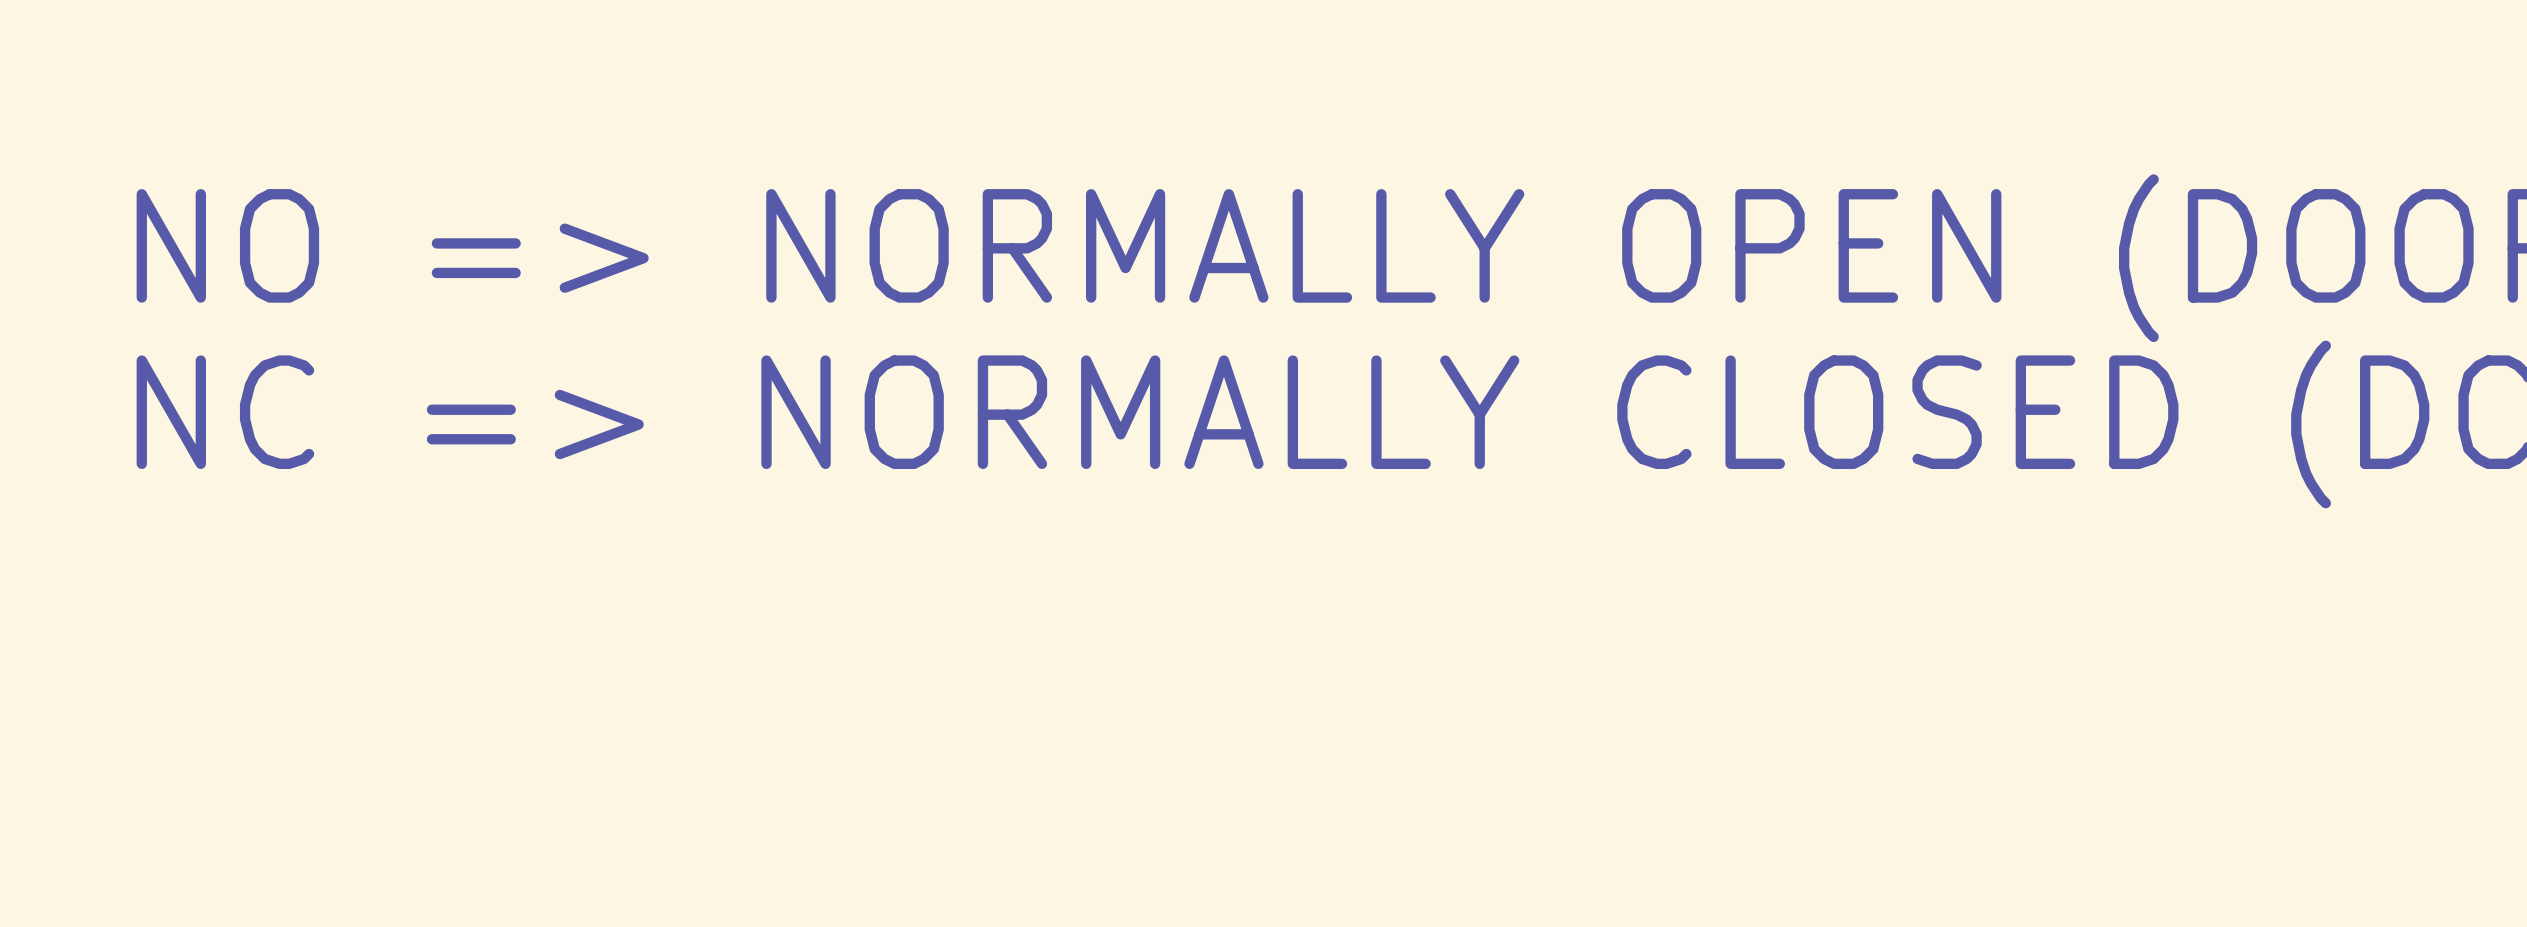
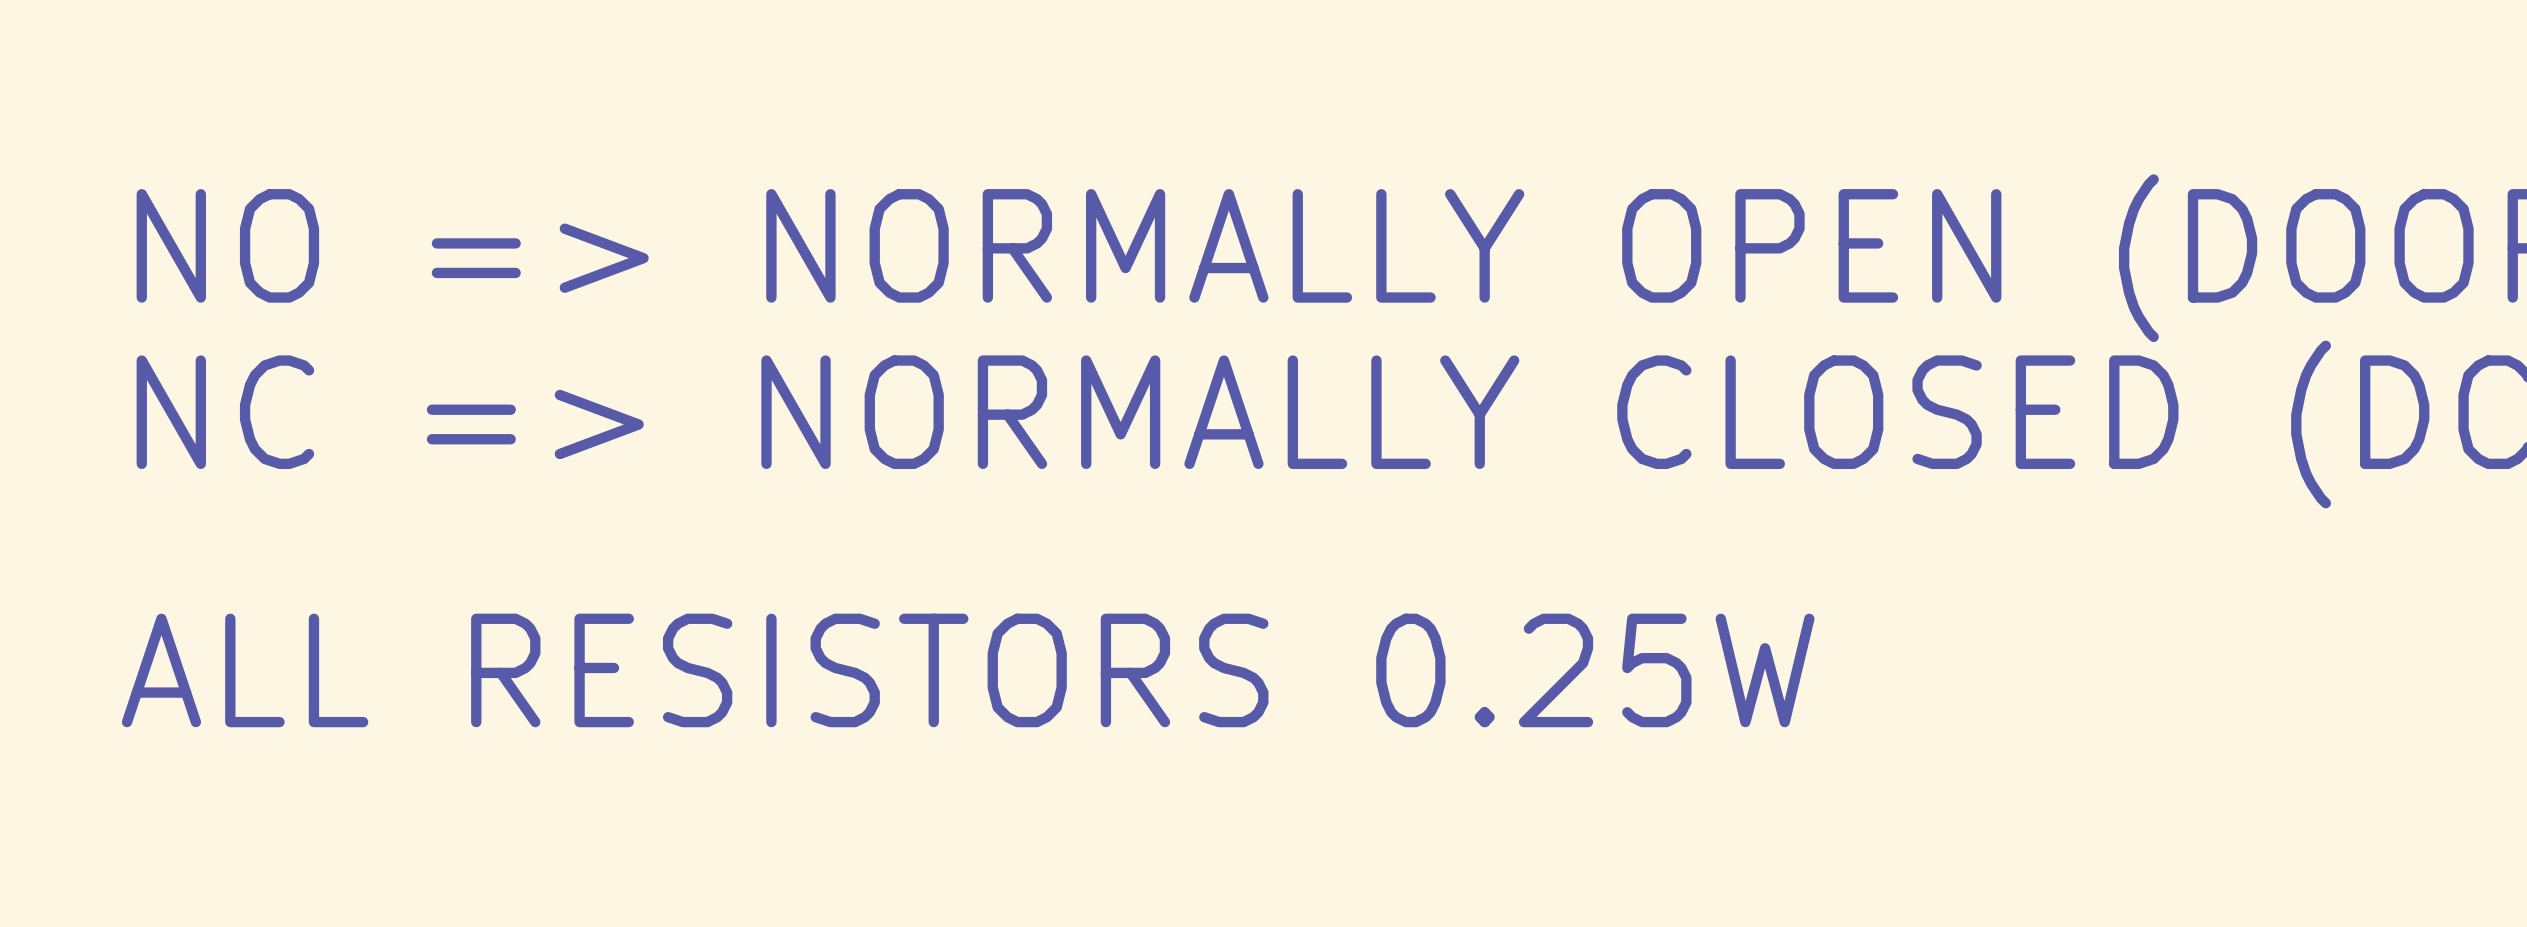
text: none -> ALL RESISTORS 0.25W (968, 670)

